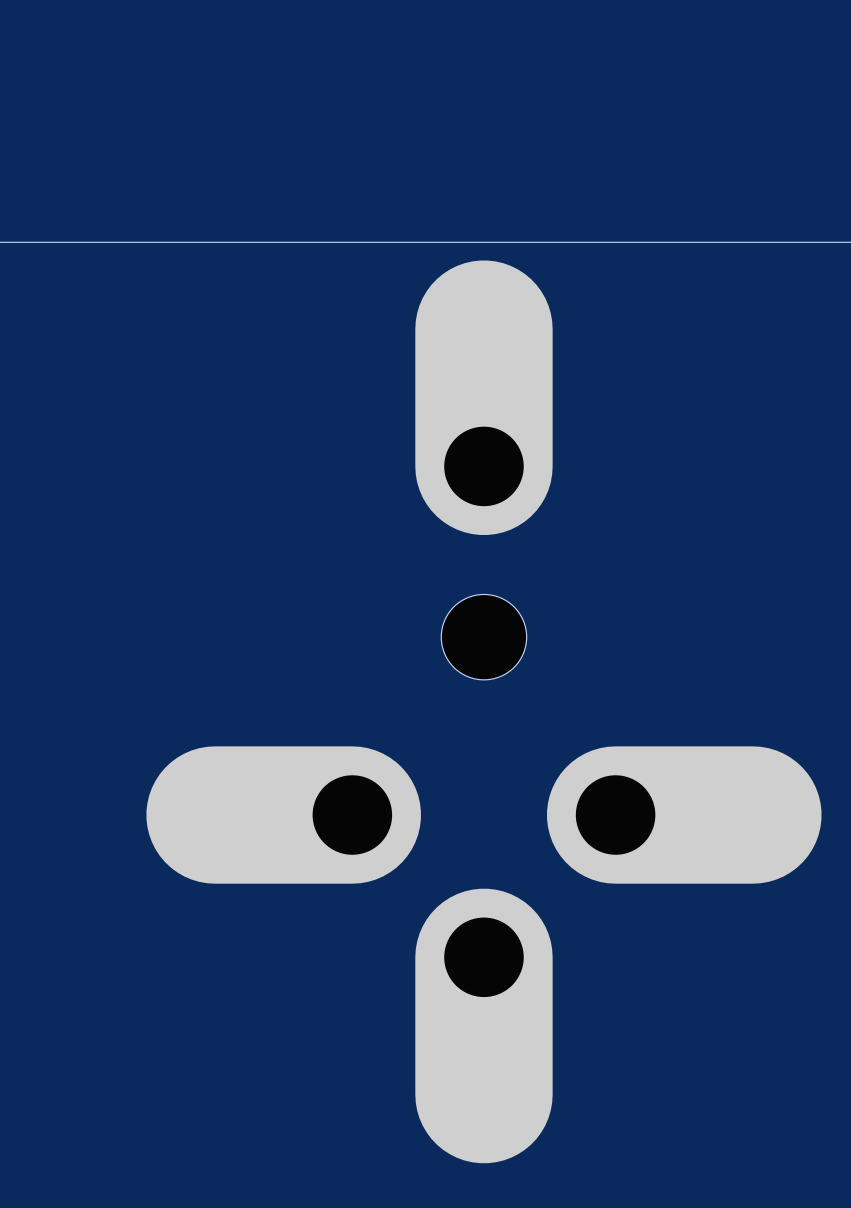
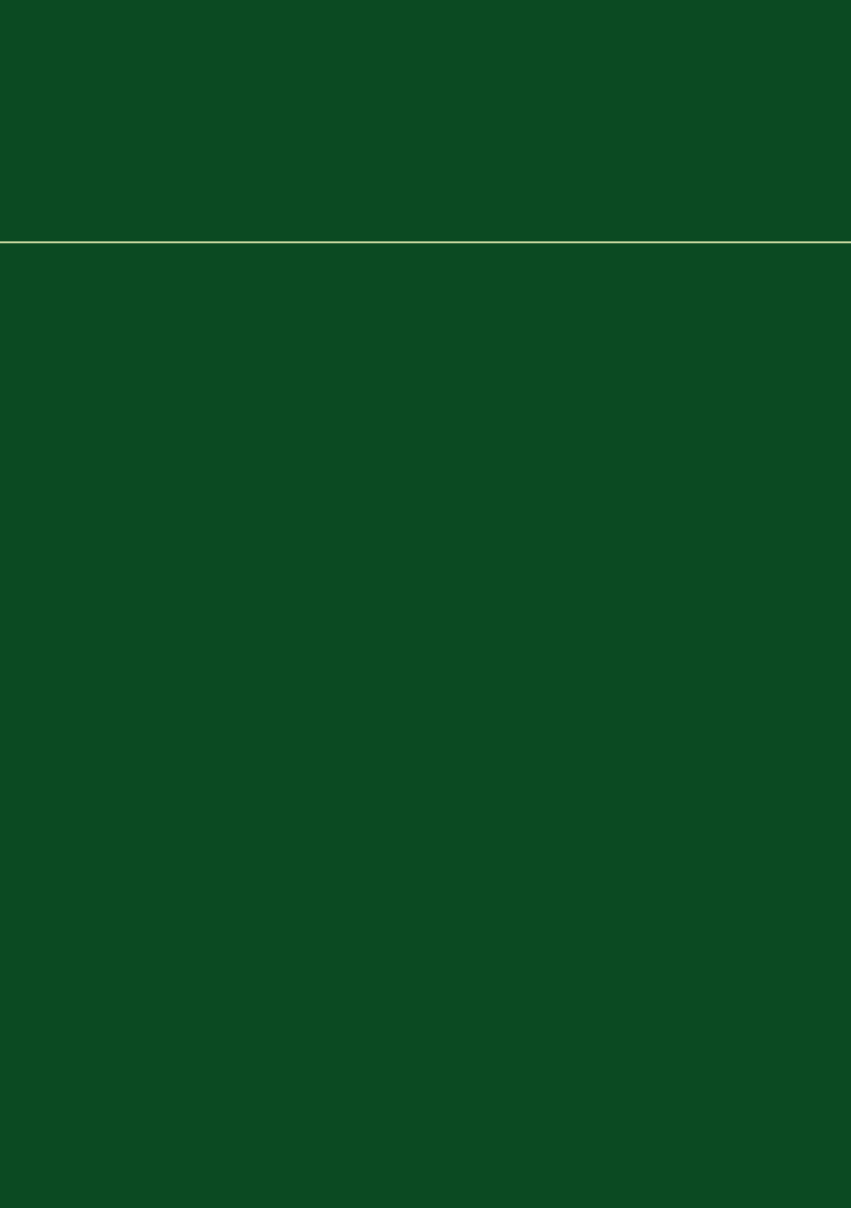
part: (483, 711) -> none

